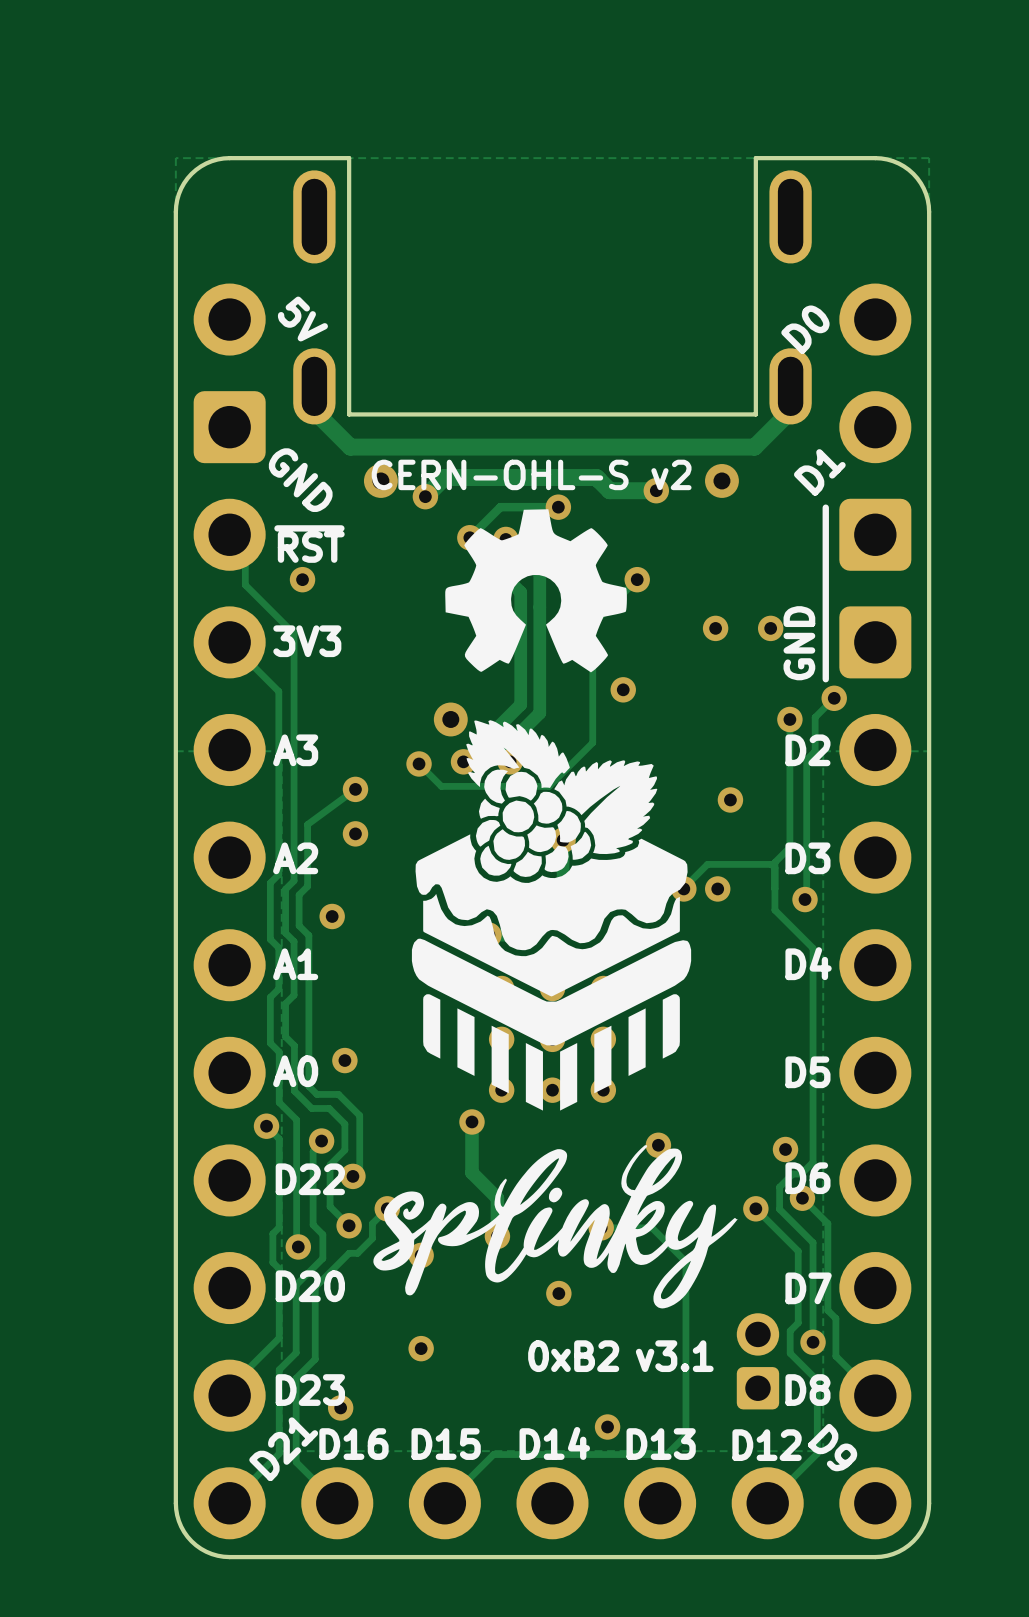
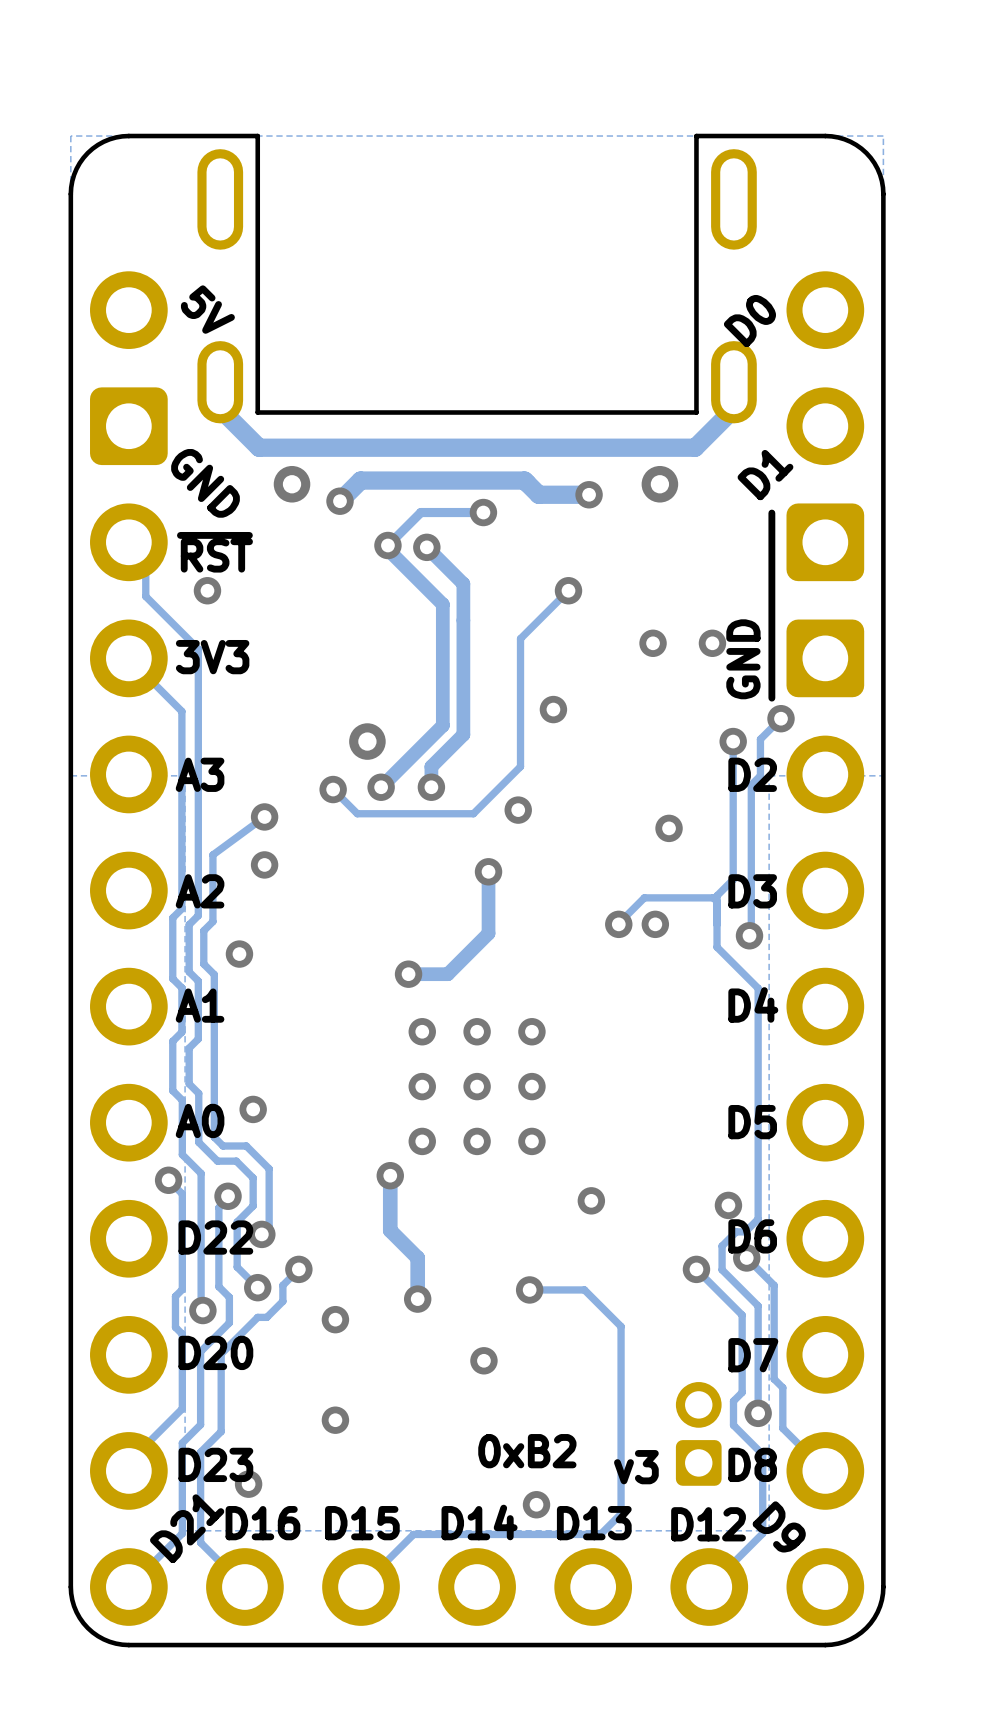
text: CERN-OHL-S v2 (531, 474) -> none
drawing: [373, 509, 738, 1309] -> none
text position: 0xB2 (573, 1356) -> 0xB2 (527, 1451)
text: v3.1 (674, 1356) -> v3 (636, 1467)

